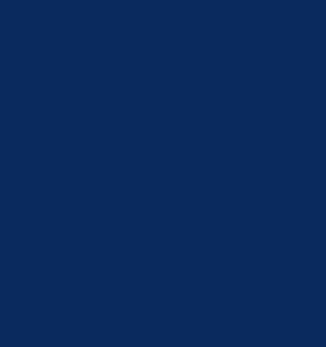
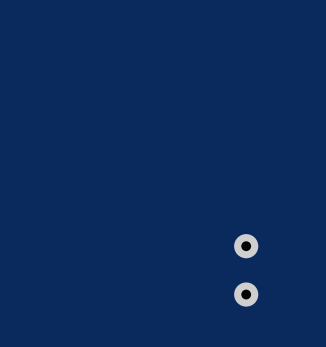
part: none -> (246, 246)
part: none -> (246, 294)

